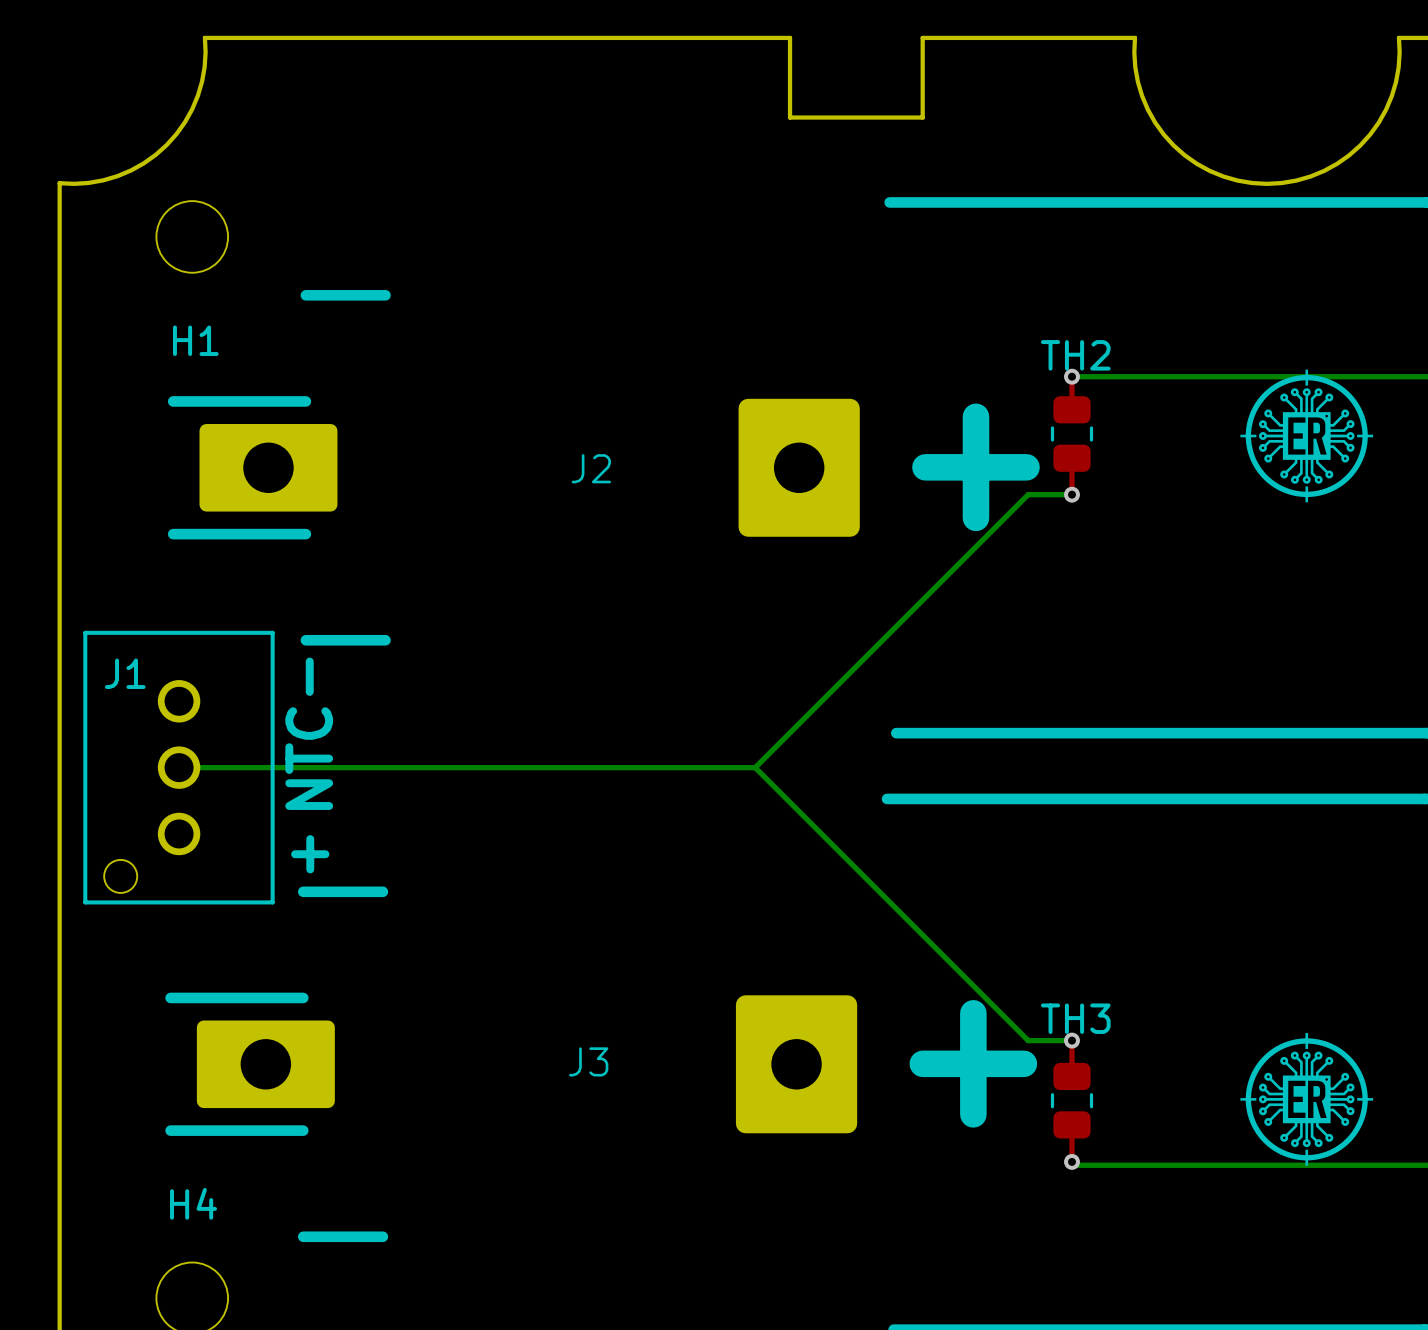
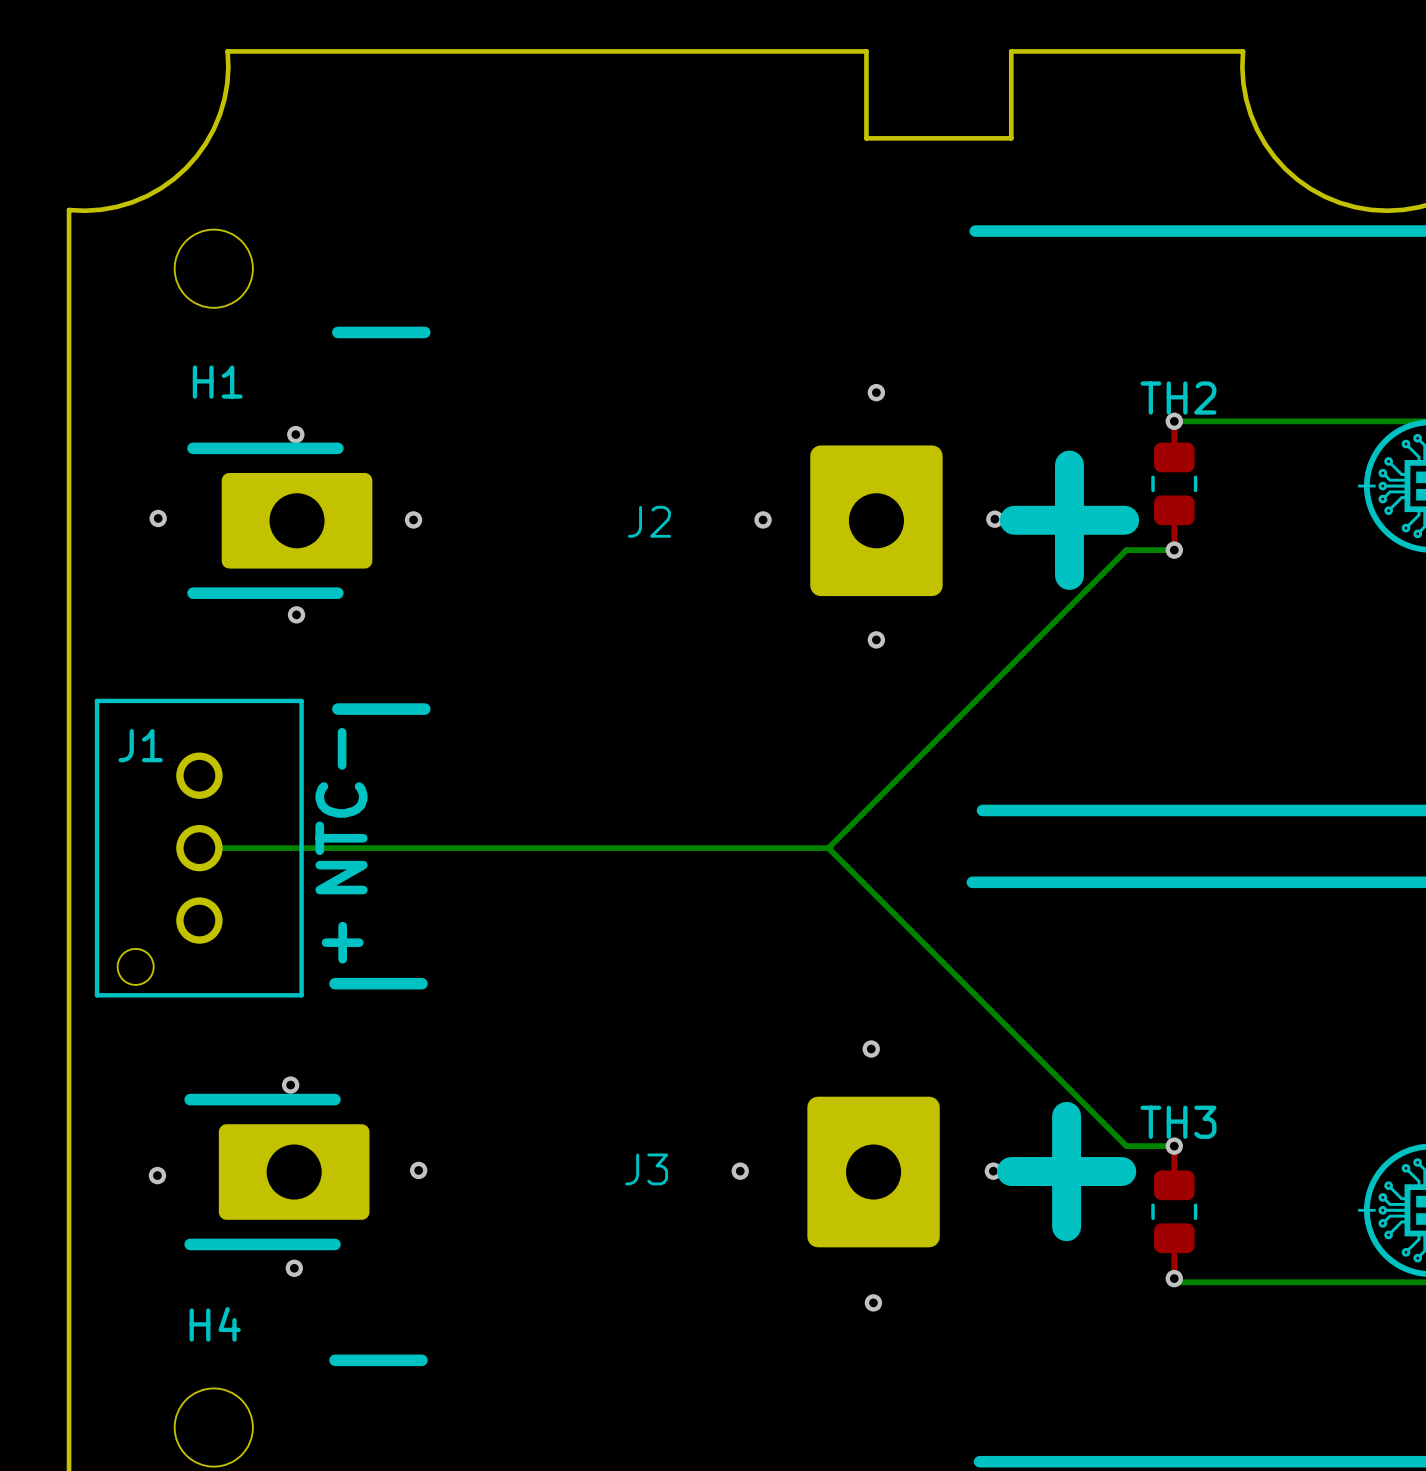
via: none -> (876, 392)
via: none -> (295, 434)
via: none -> (158, 518)
via: none -> (994, 519)
via: none -> (413, 519)
via: none -> (763, 519)
via: none -> (296, 614)
via: none -> (876, 639)
via: none -> (871, 1049)
via: none -> (290, 1085)
via: none -> (418, 1170)
via: none -> (740, 1171)
via: none -> (993, 1171)
via: none -> (157, 1175)
via: none -> (294, 1268)
via: none -> (873, 1302)

